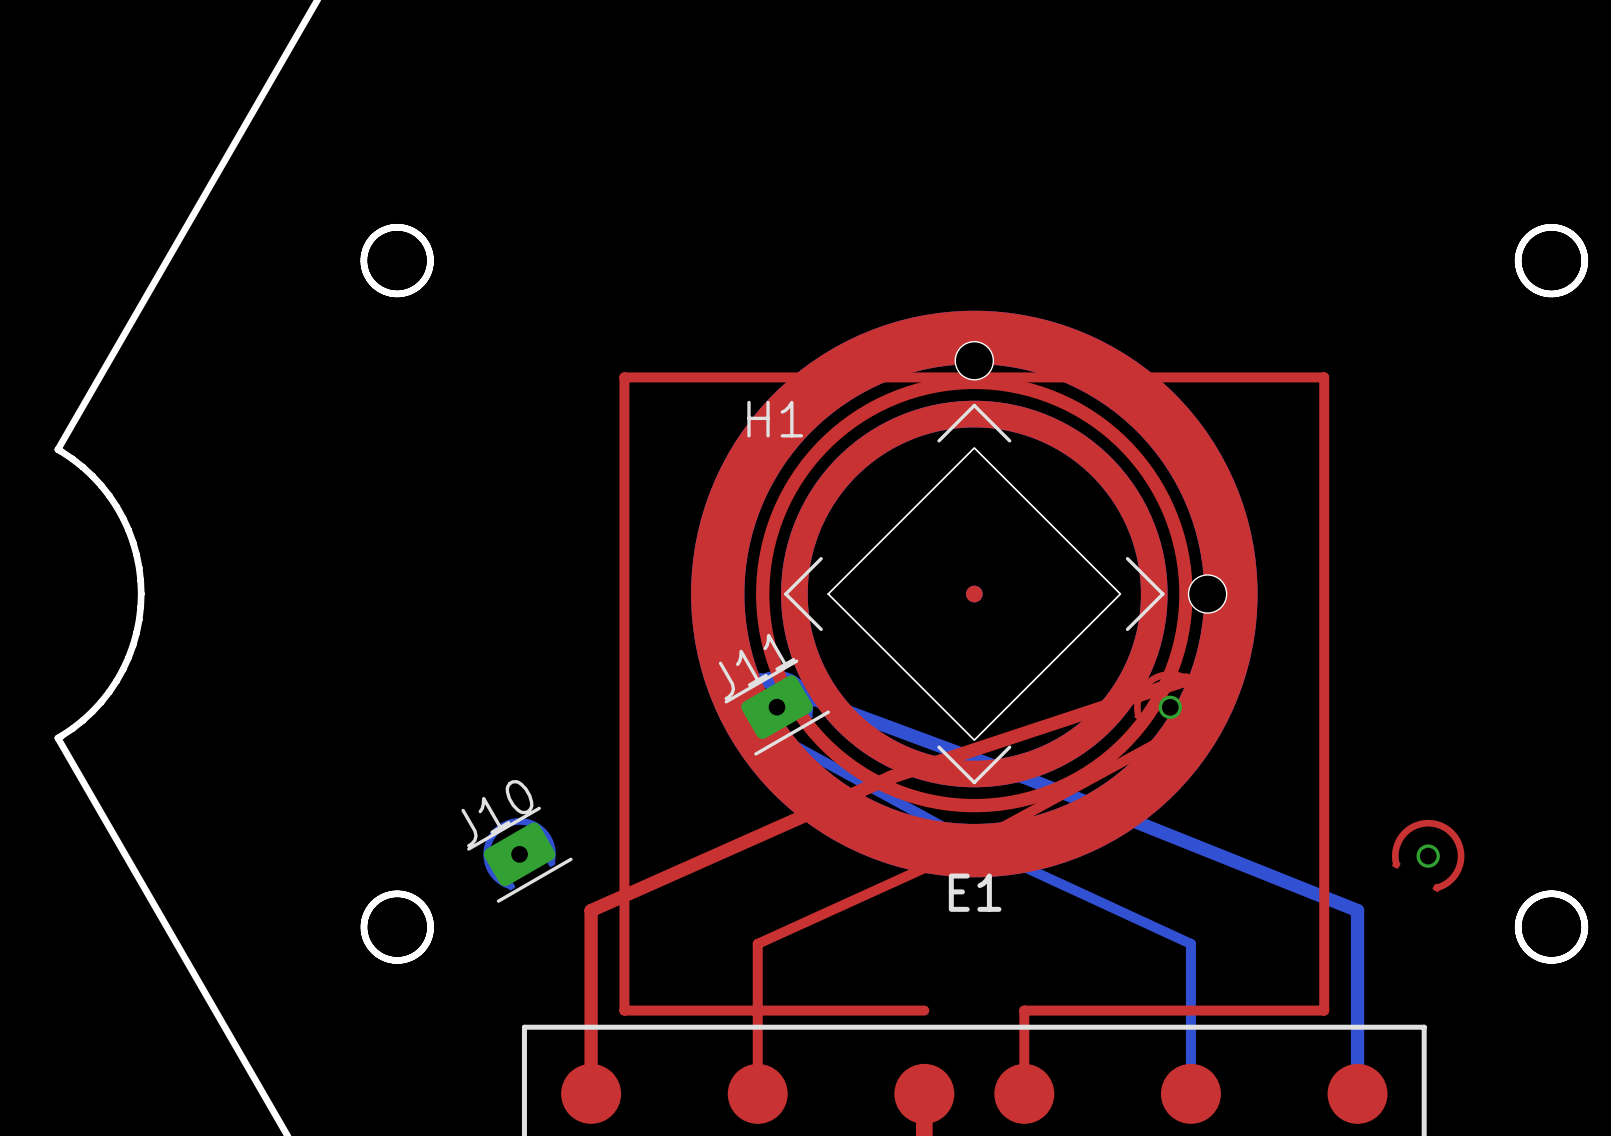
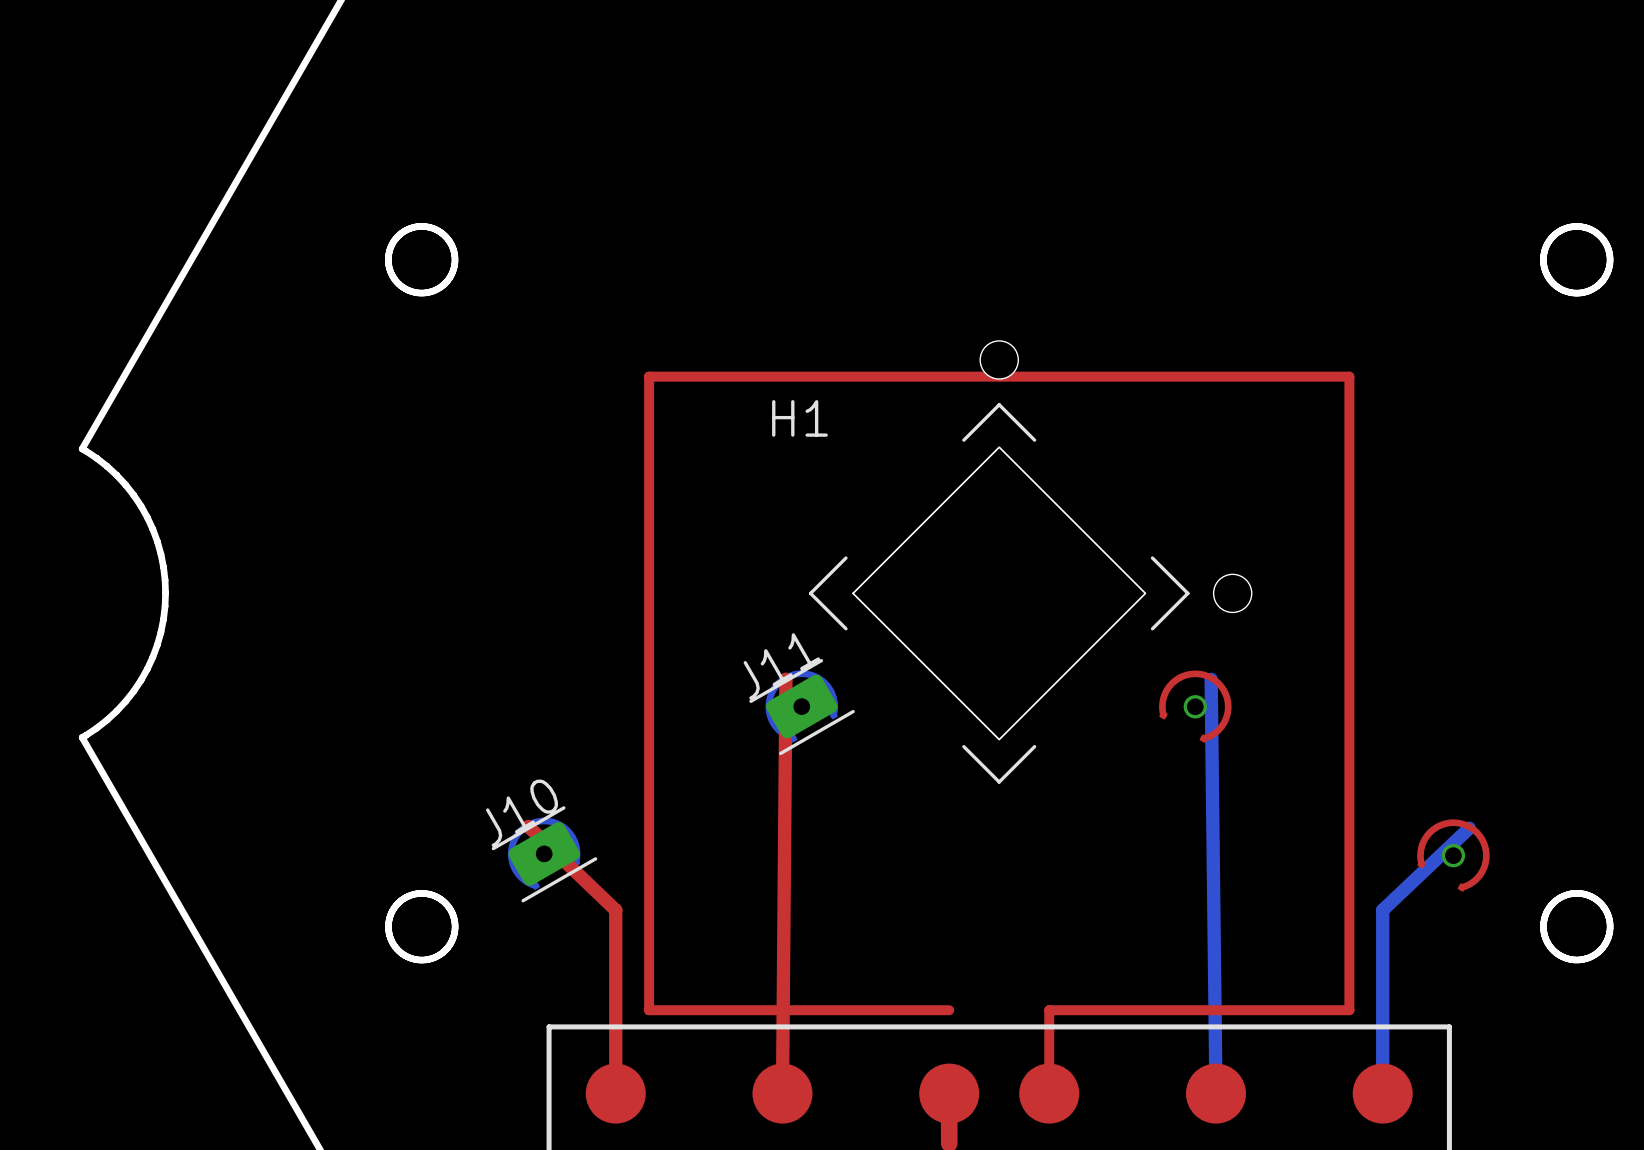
E1: (974, 594) -> none
bottom track: (761, 679) (1024, 777) (1357, 910) -> (1469, 828) (1382, 910)
top track: (1186, 679) (891, 777) (591, 910) -> (528, 826) (615, 910)
bottom track: (761, 727) (974, 843) (1190, 943) (1190, 1093) -> (1211, 679) (1215, 1093)
top track: (1186, 727) (941, 860) (757, 943) (757, 1093) -> (785, 679) (782, 1093)

